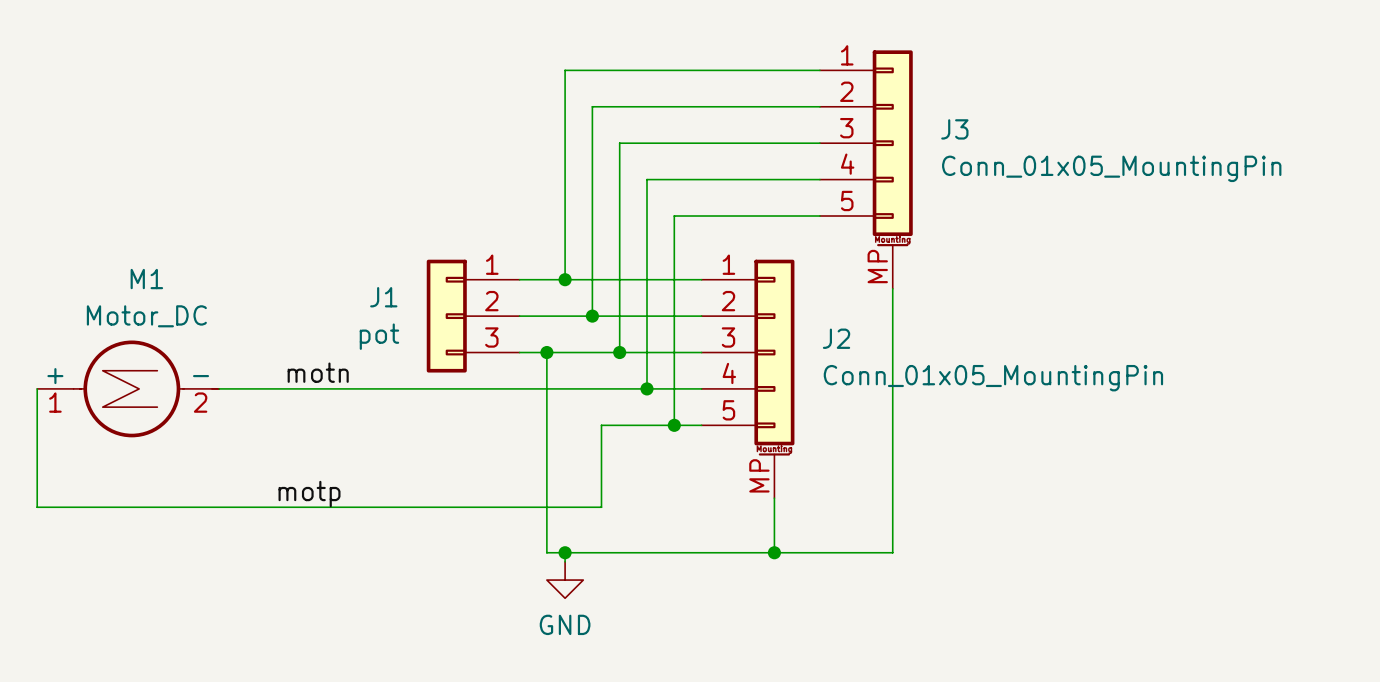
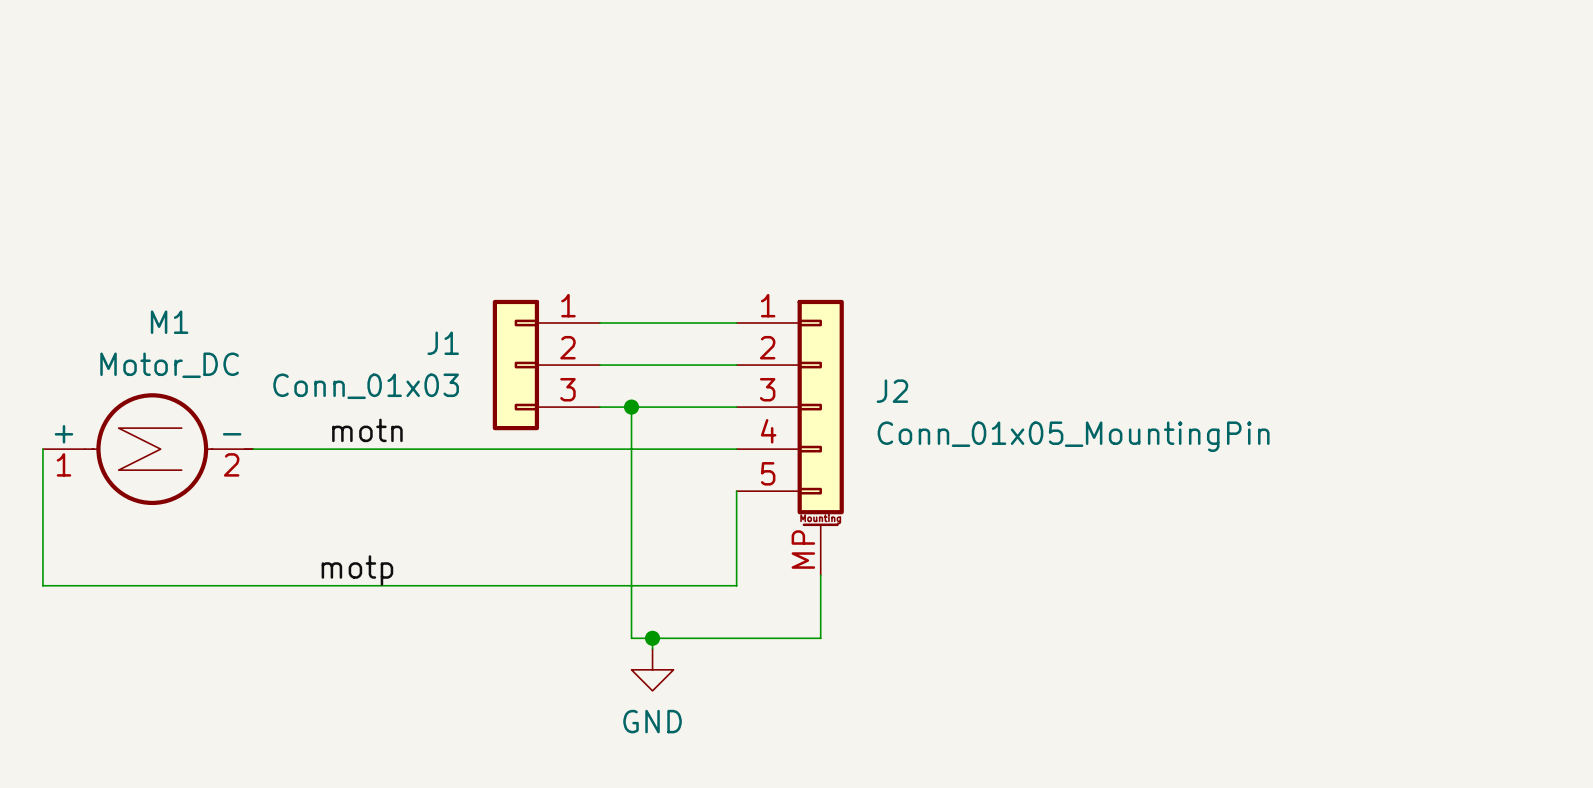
wire: (819, 70) (565, 70) (565, 279) -> none
wire: (819, 106) (592, 106) (592, 316) -> none
wire: (819, 143) (619, 143) (619, 352) -> none
J3: Conn_01x05_MountingPin (866, 169) -> none
wire: (819, 179) (647, 179) (647, 388) -> none
wire: (819, 216) (674, 216) (674, 425) -> none
junction: (565, 279) -> none
wire: (892, 288) (892, 552) (710, 552) -> (820, 575) (820, 638)
junction: (592, 316) -> none
J1 value: pot (379, 336) -> Conn_01x03 (366, 386)
junction: (619, 352) -> none
J2 position: (748, 378) -> (790, 437)
junction: (647, 388) -> none
junction: (674, 425) -> none
wire: (701, 425) (601, 425) (601, 507) -> (736, 491) (736, 585) (694, 585)
wire: (774, 498) (774, 552) -> none
junction: (774, 552) -> none

